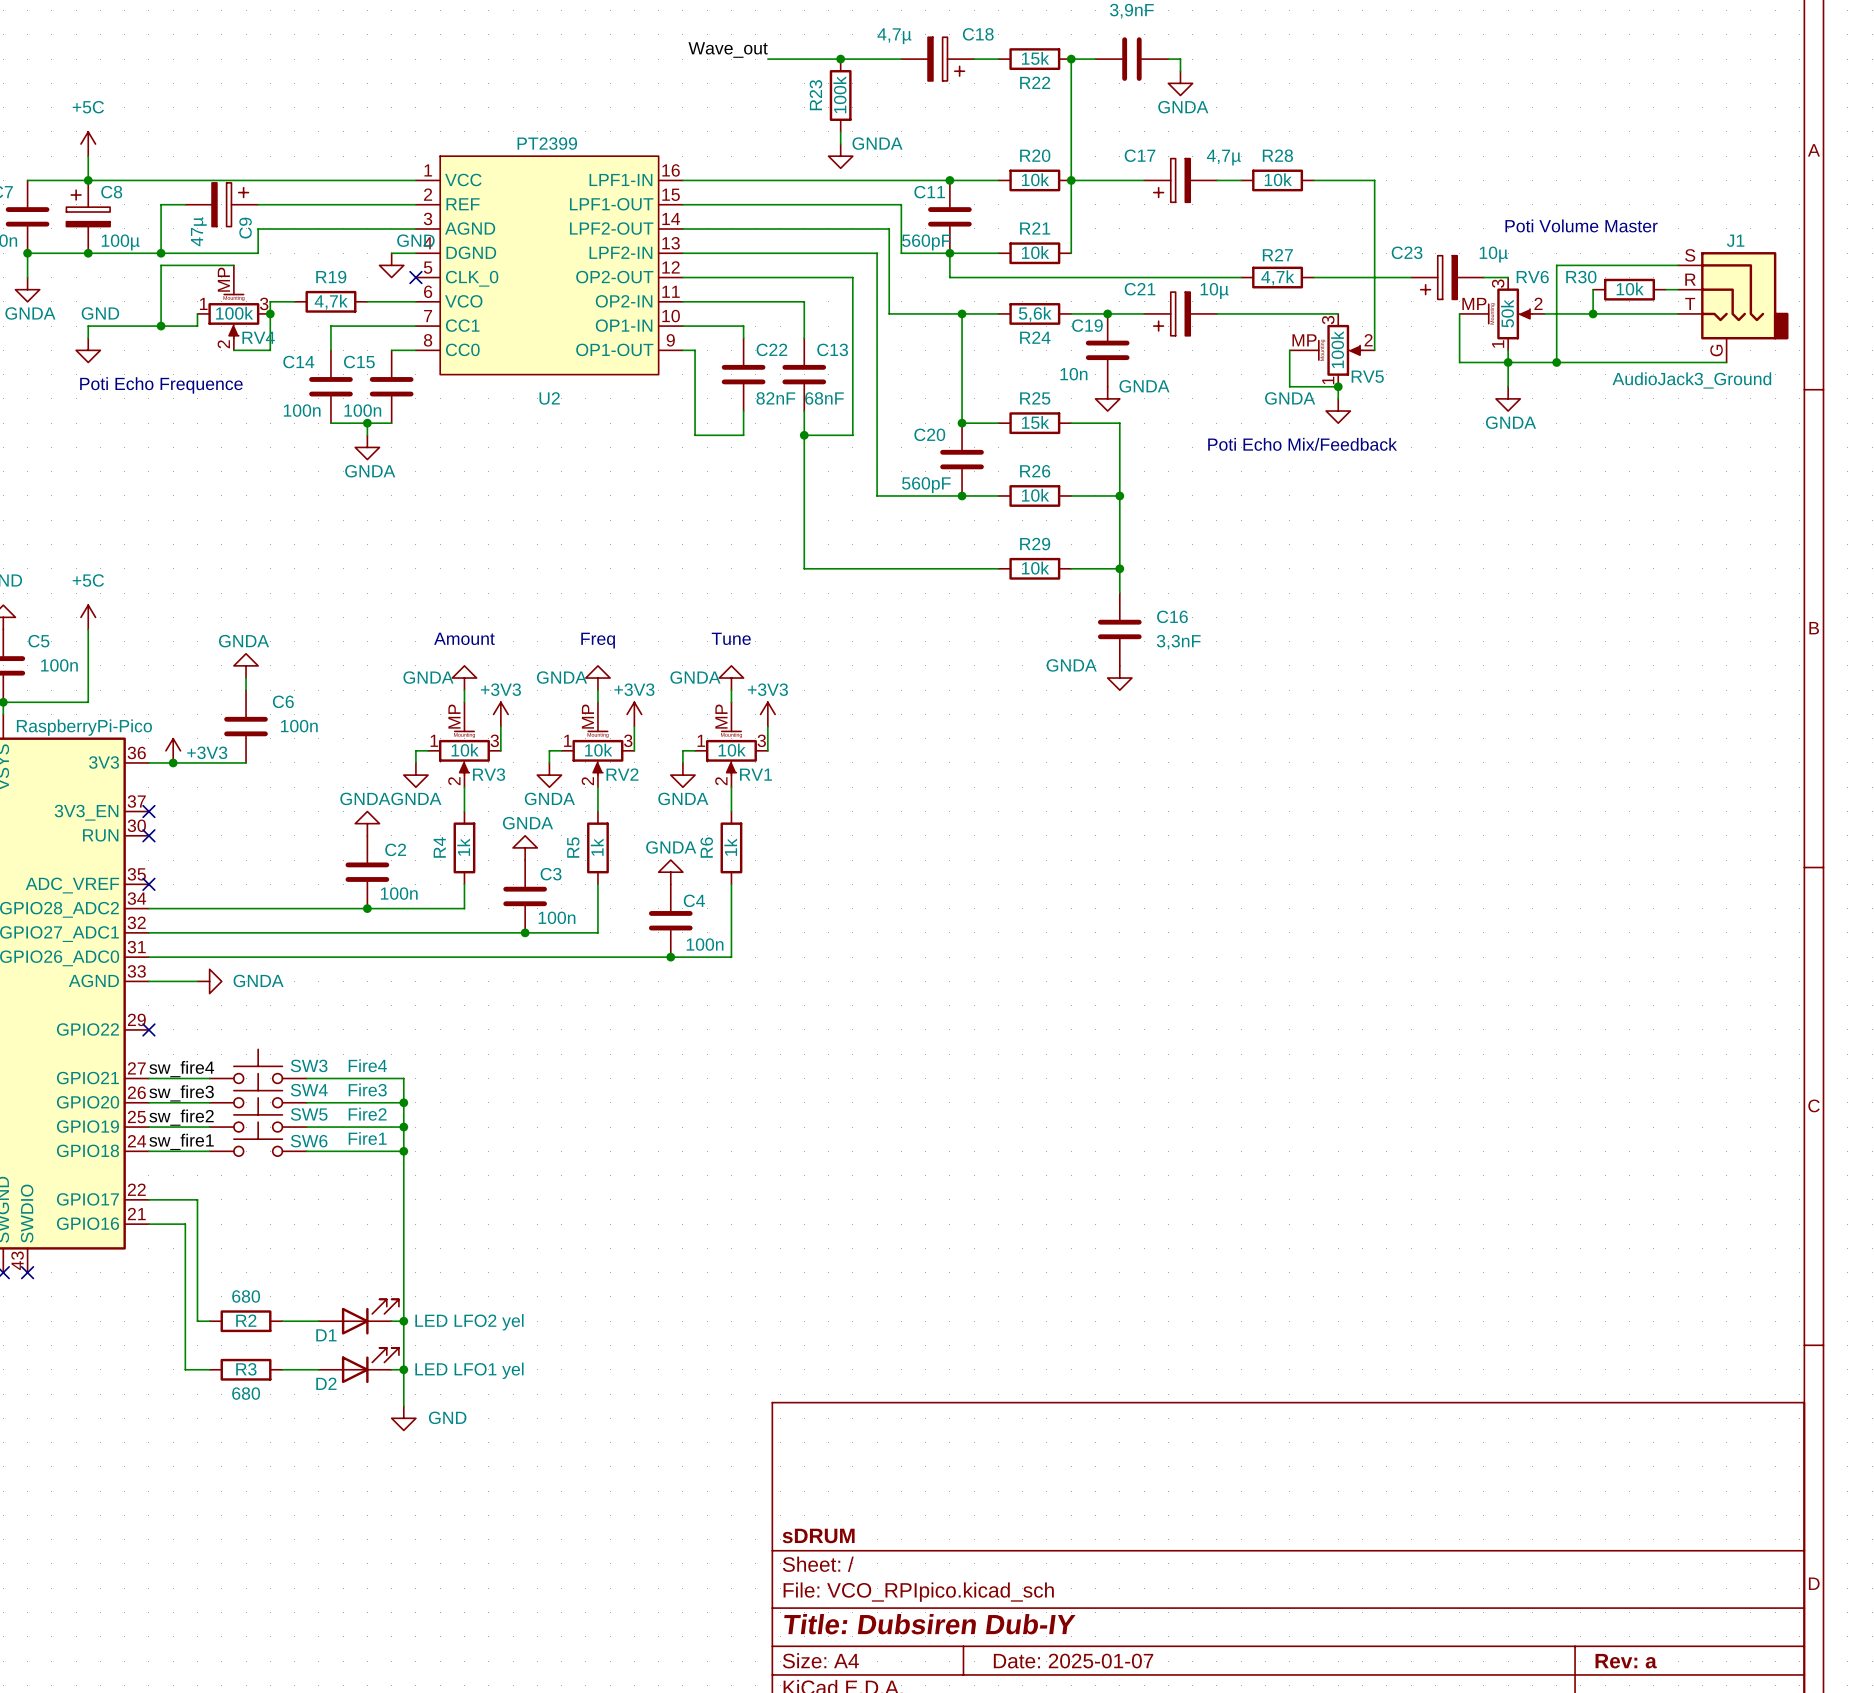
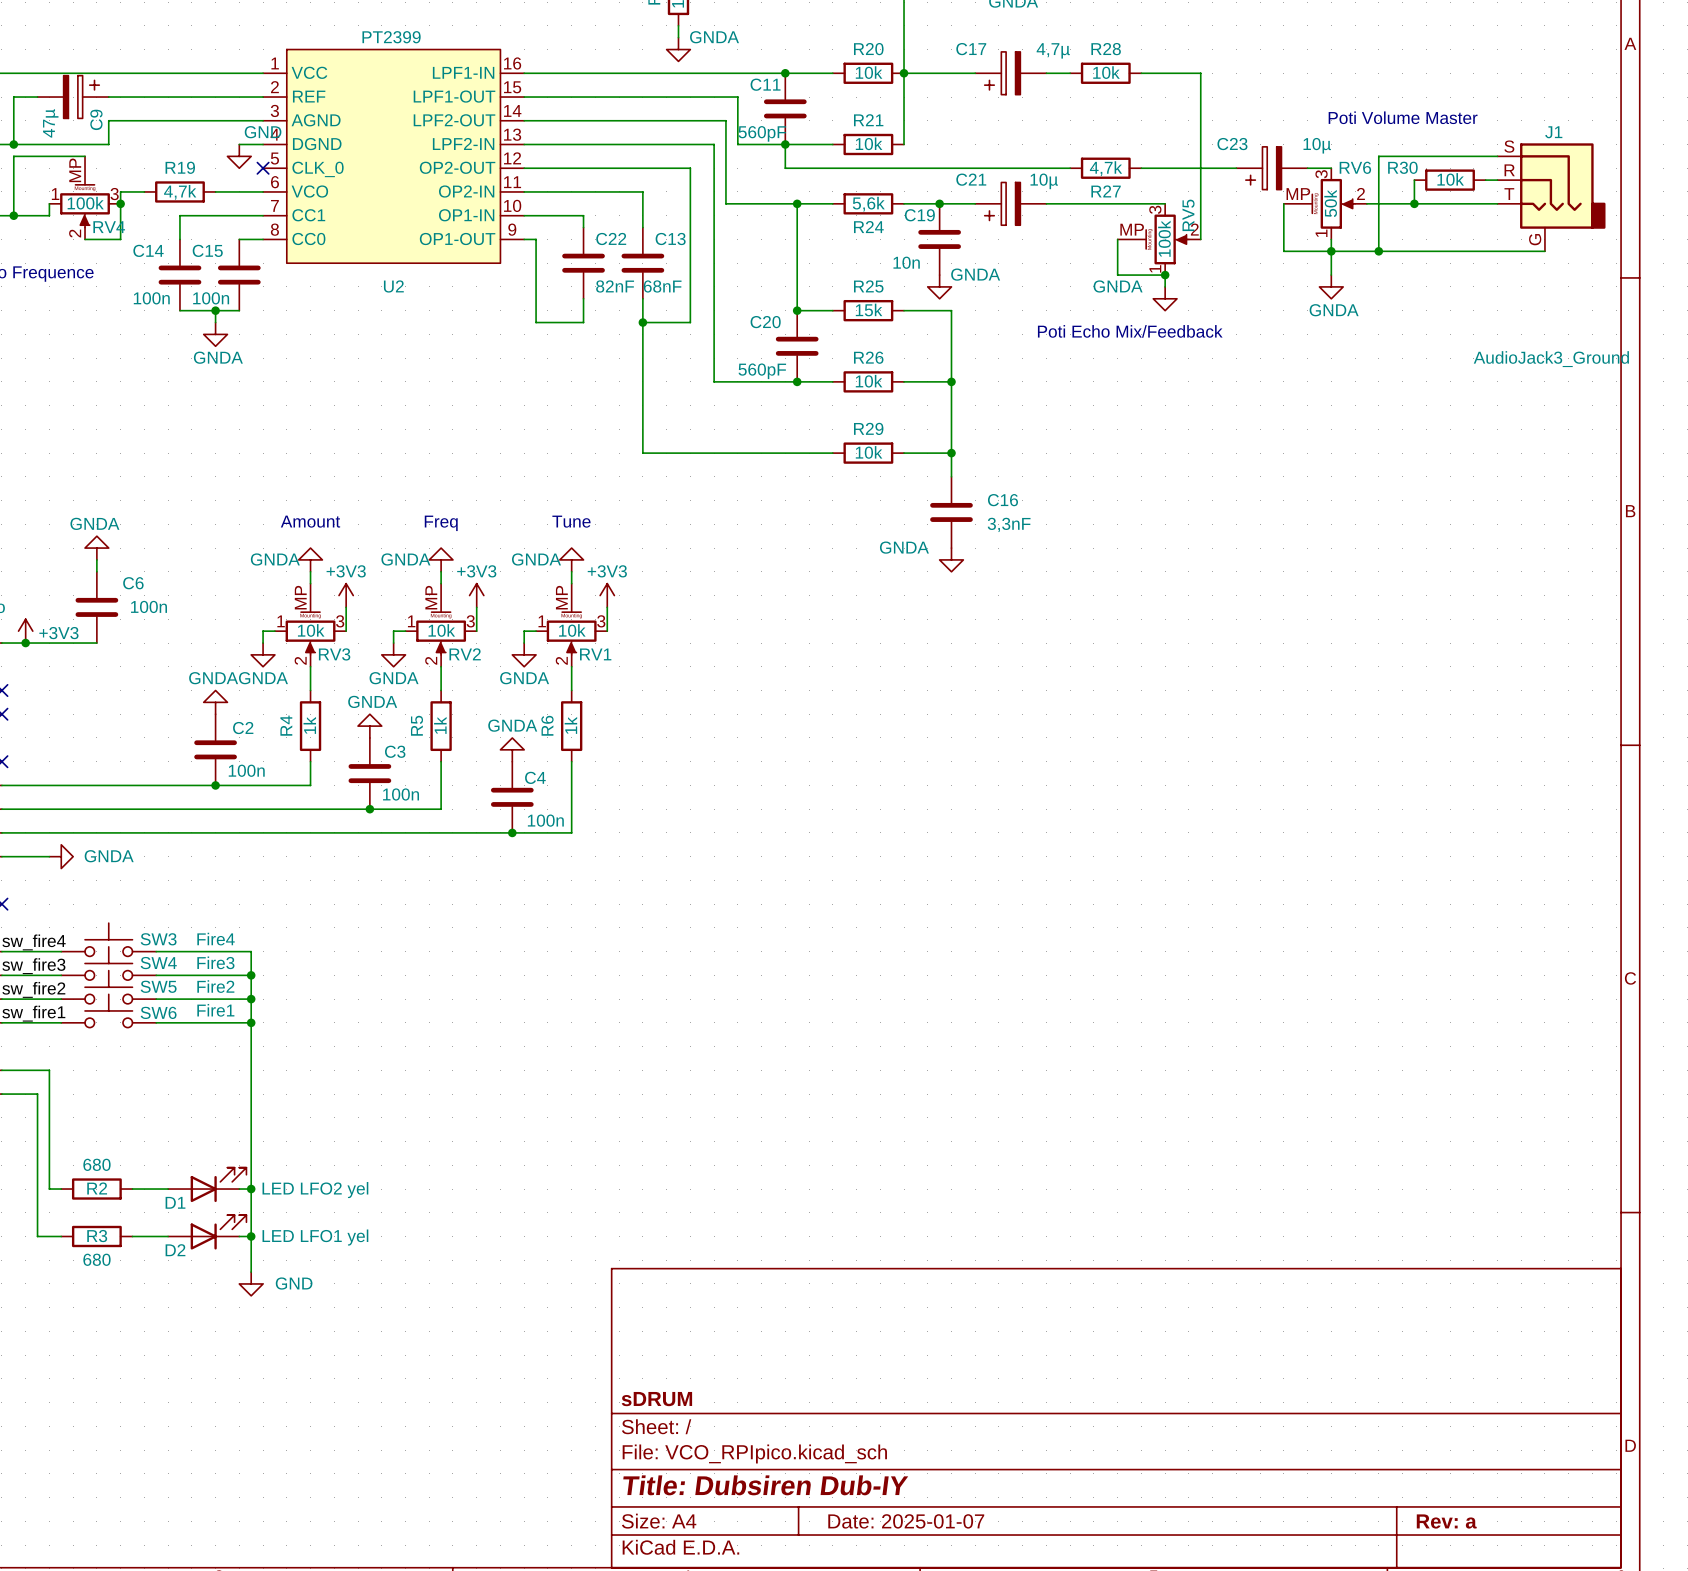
R27 name position: R27 (1277, 255) -> R27 (1106, 191)
RV5 name rotation: 0° (1367, 376) -> 90° counterclockwise (1188, 215)
RV5 name position: RV5 (1367, 376) -> RV5 (1188, 215)
J1 value position: AudioJack3_Ground (1691, 380) -> AudioJack3_Ground (1551, 359)

